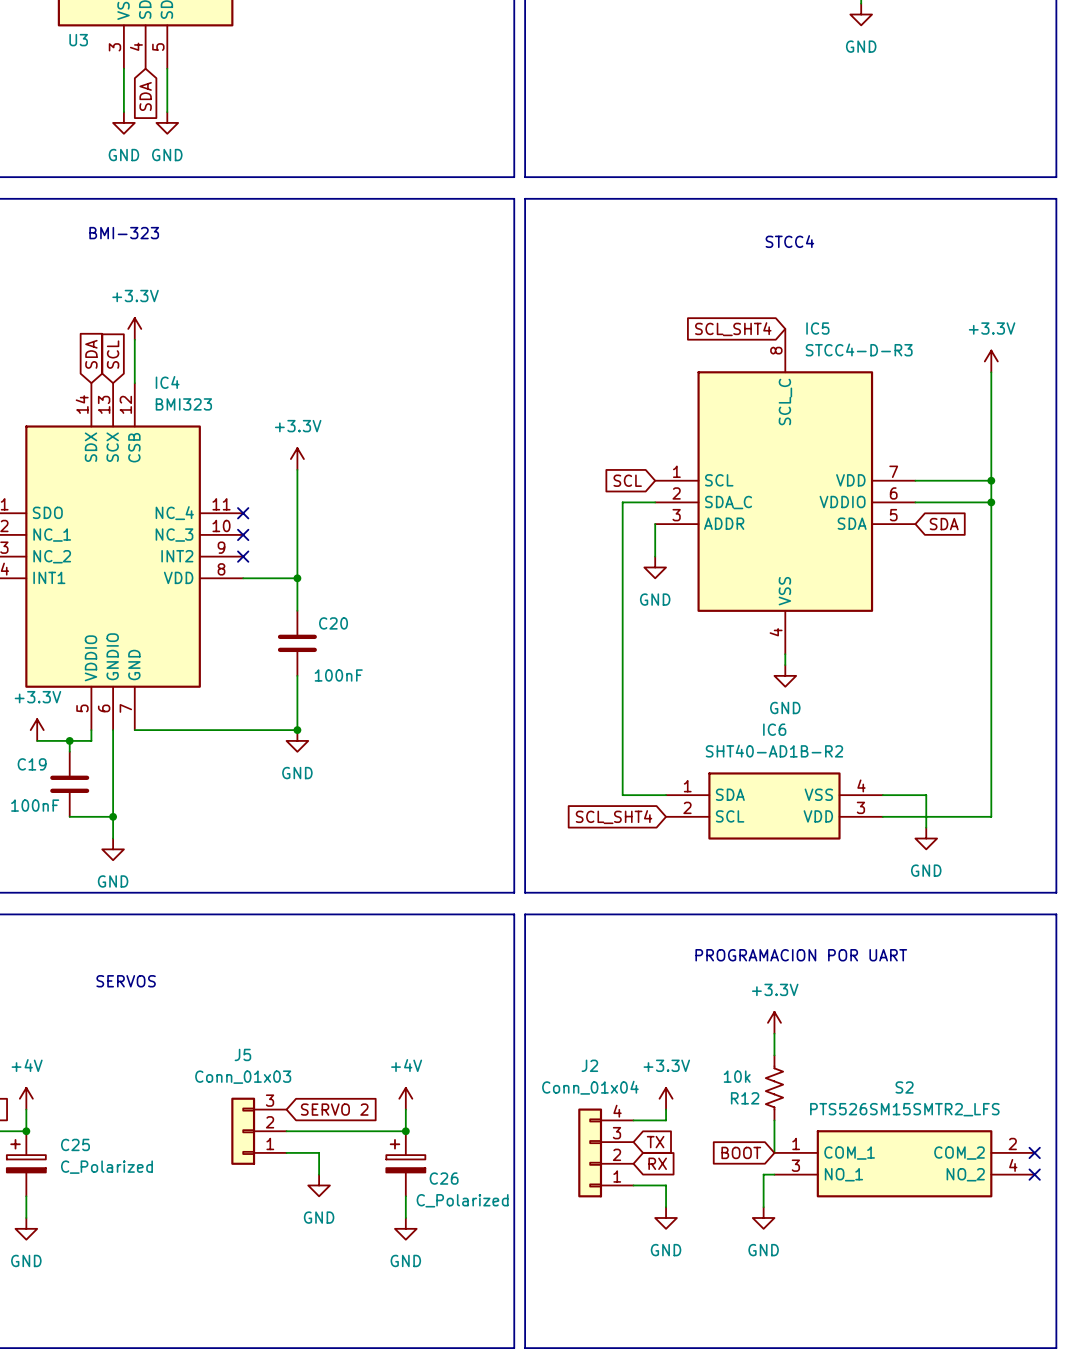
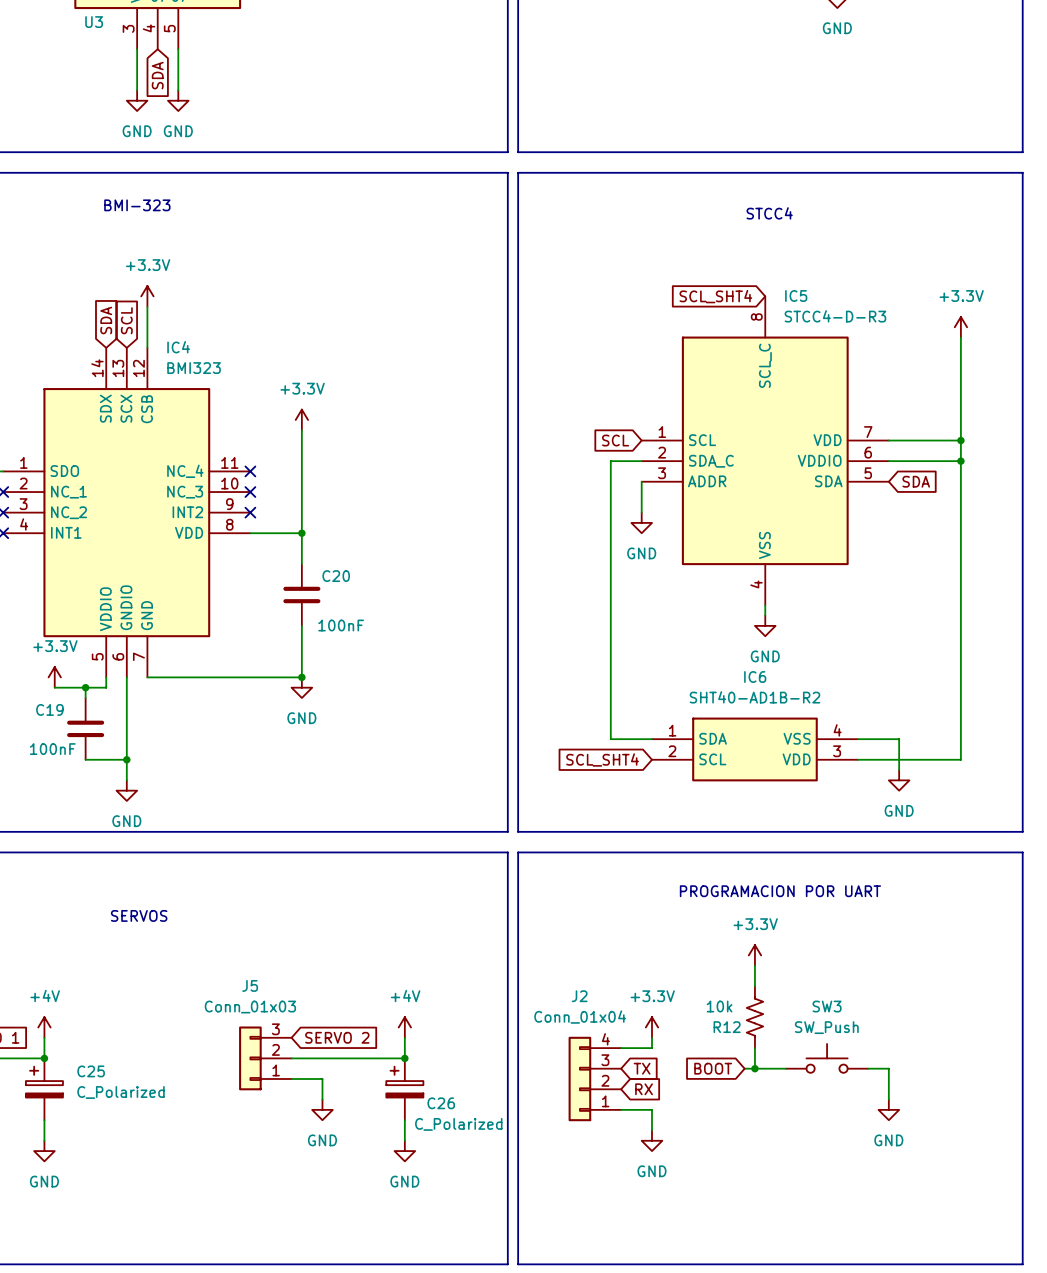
SW3: none -> SW_Push (827, 1058)
wire: none -> (744, 1068) (785, 1068)
wire: (774, 1142) (774, 1152) -> none
junction: none -> (754, 1068)
global label position: BOOT (741, 1152) -> BOOT (713, 1068)
no-connect mark: (1034, 1152) -> none
S2: PTS526SM15SMTR2_LFS (904, 1163) -> none
wire: (774, 1174) (763, 1174) (763, 1207) -> none
no-connect mark: (1034, 1174) -> none
power symbol position: GND (763, 1217) -> GND (888, 1109)

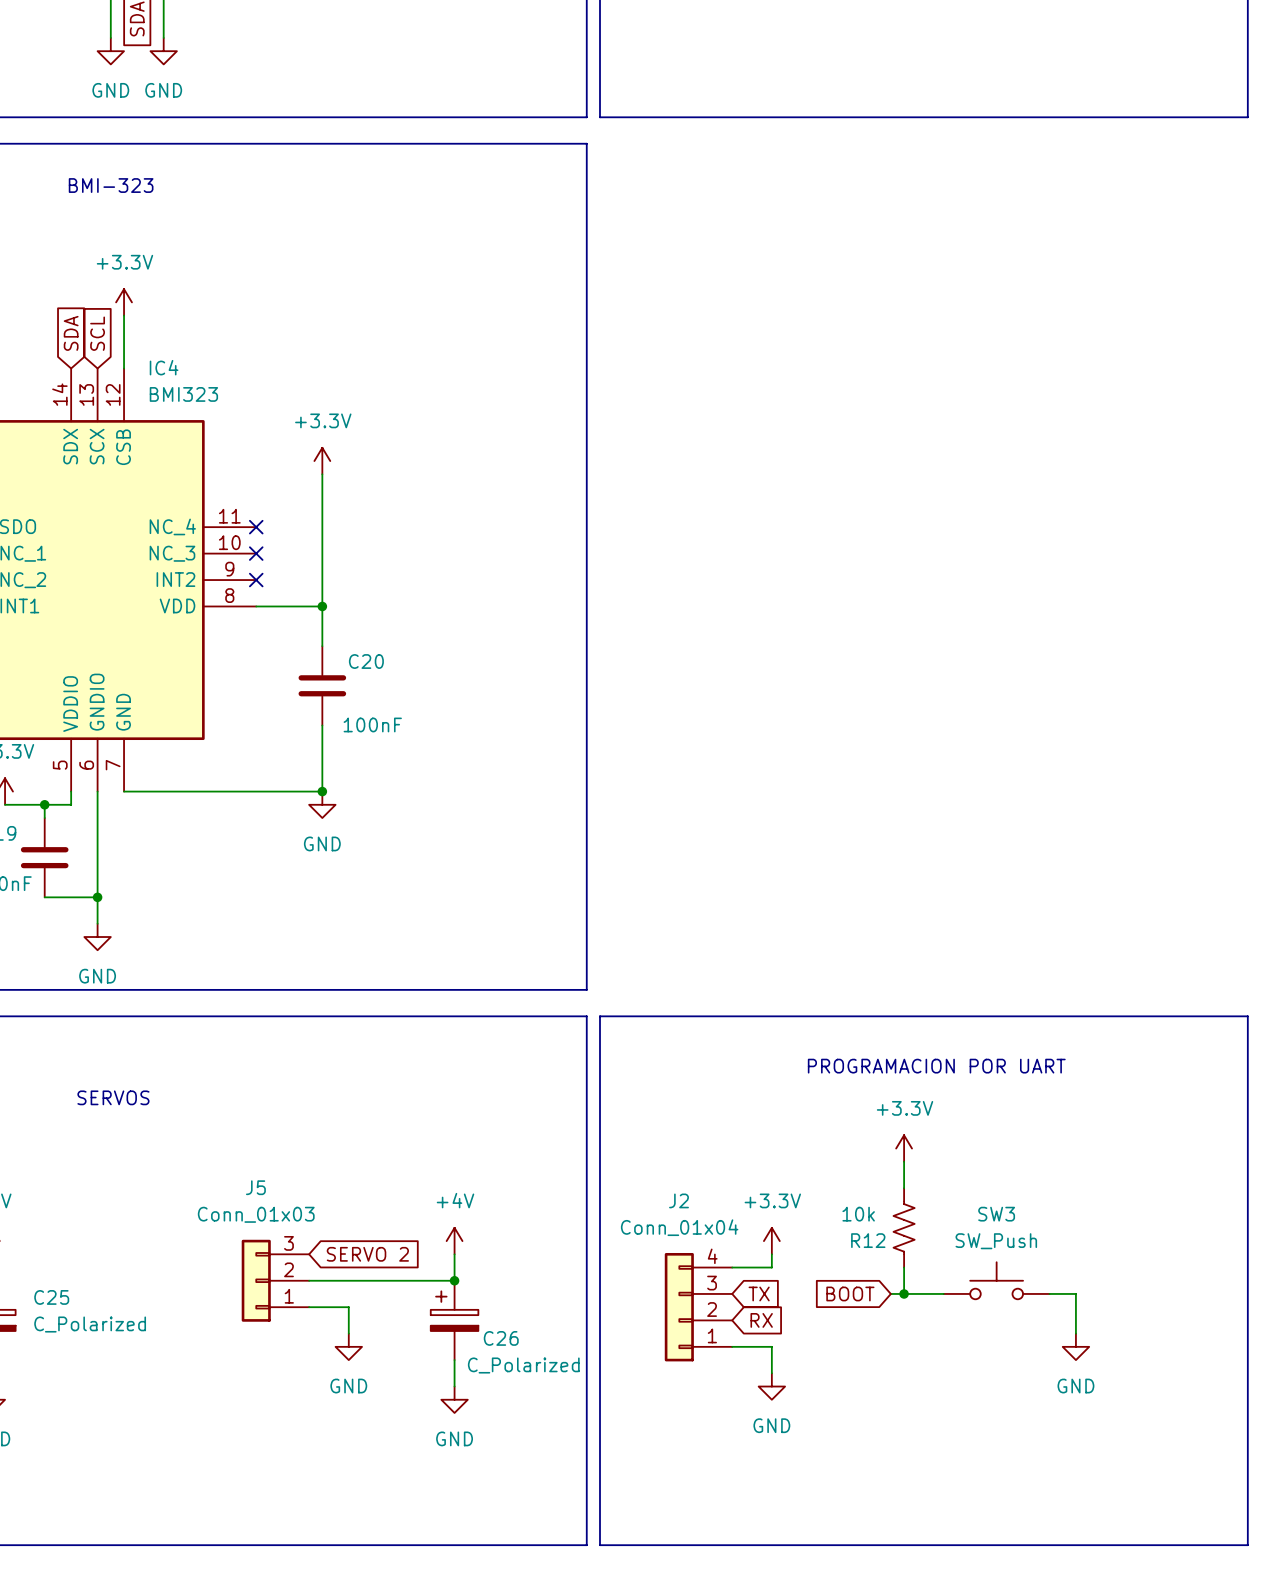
line: (518, 172) (1022, 172) (1022, 831) (518, 831) (518, 172) -> none
text: STCC4 (769, 213) -> none
global label: SCL_SHT4 (715, 296) -> none
power symbol: +3.3V (960, 327) -> none
wire: (960, 337) (960, 759) (857, 759) -> none
global label: SCL (615, 440) -> none
wire: (888, 440) (960, 440) -> none
junction: (960, 440) -> none
IC5: STCC4-D-R3 (765, 450) -> none
wire: (641, 461) (610, 461) (610, 739) (651, 739) -> none
wire: (888, 461) (960, 461) -> none
junction: (960, 461) -> none
wire: (641, 481) (641, 512) -> none
global label: SDA (916, 481) -> none
power symbol: GND (641, 522) -> none
wire: (765, 605) (765, 615) -> none
power symbol: GND (765, 625) -> none
wire: (857, 739) (899, 739) (899, 770) -> none
IC6: SHT40-AD1B-R2 (754, 749) -> none
global label: SCL_SHT4 (602, 760) -> none
power symbol: GND (899, 780) -> none

